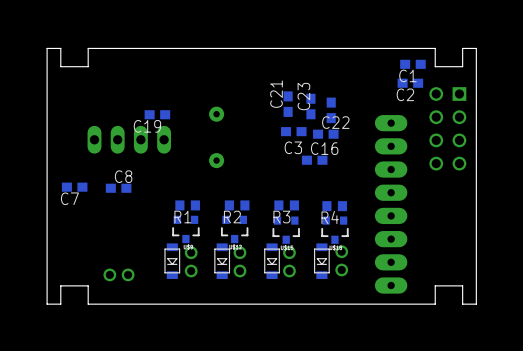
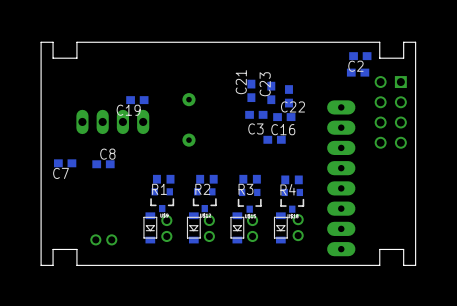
C1 name: C1 (407, 75) -> C2 (355, 66)
C2 name: C2 (405, 94) -> none

